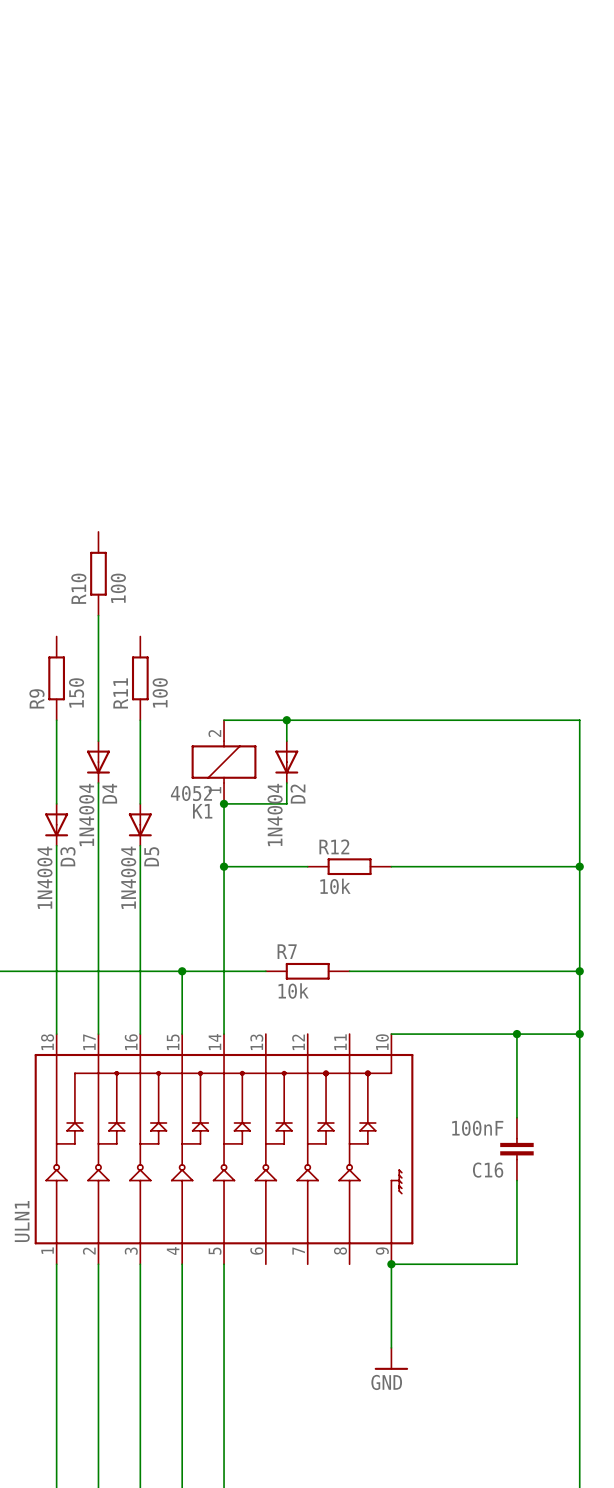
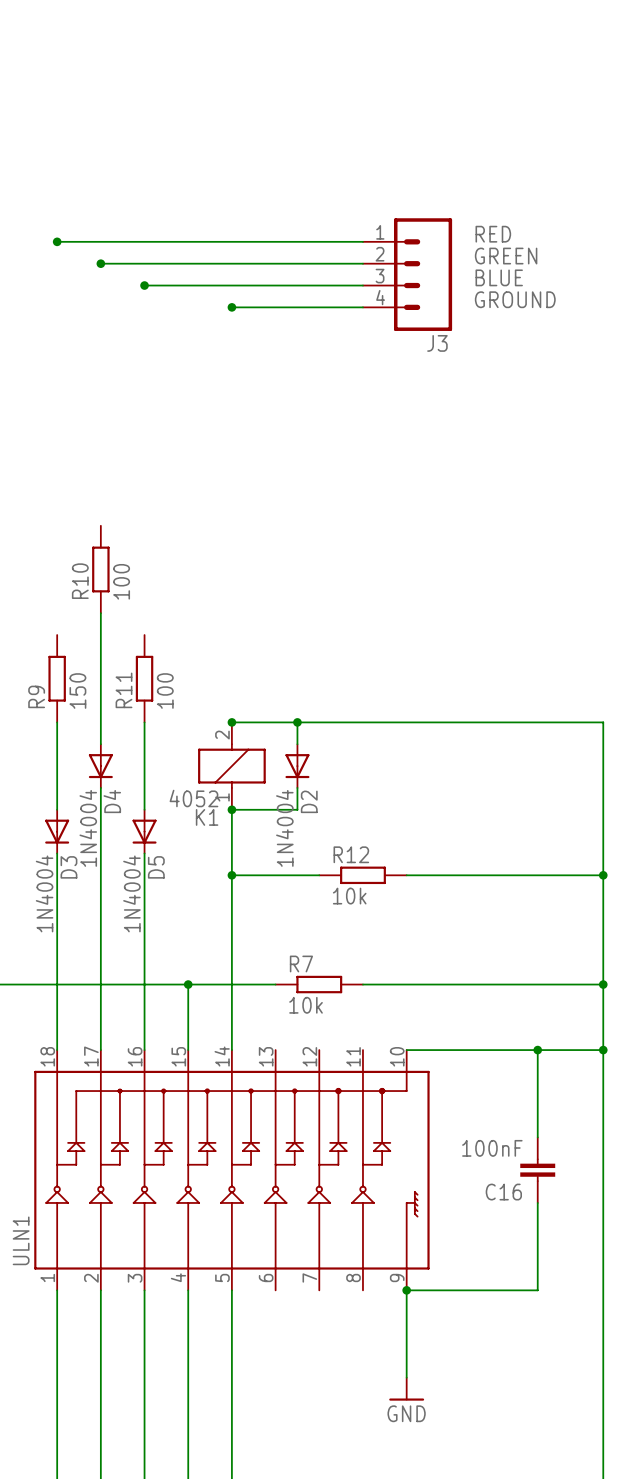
label: none -> RED (493, 234)
wire: none -> (57, 241) (362, 241)
junction: none -> (57, 241)
label: none -> GREEN (506, 256)
wire: none -> (100, 263) (362, 263)
junction: none -> (100, 263)
J3: none -> (407, 274)
label: none -> BLUE (499, 277)
wire: none -> (144, 285) (362, 285)
junction: none -> (144, 285)
label: none -> GROUND (515, 299)
wire: none -> (231, 307) (362, 307)
junction: none -> (231, 307)
junction: none -> (231, 722)

